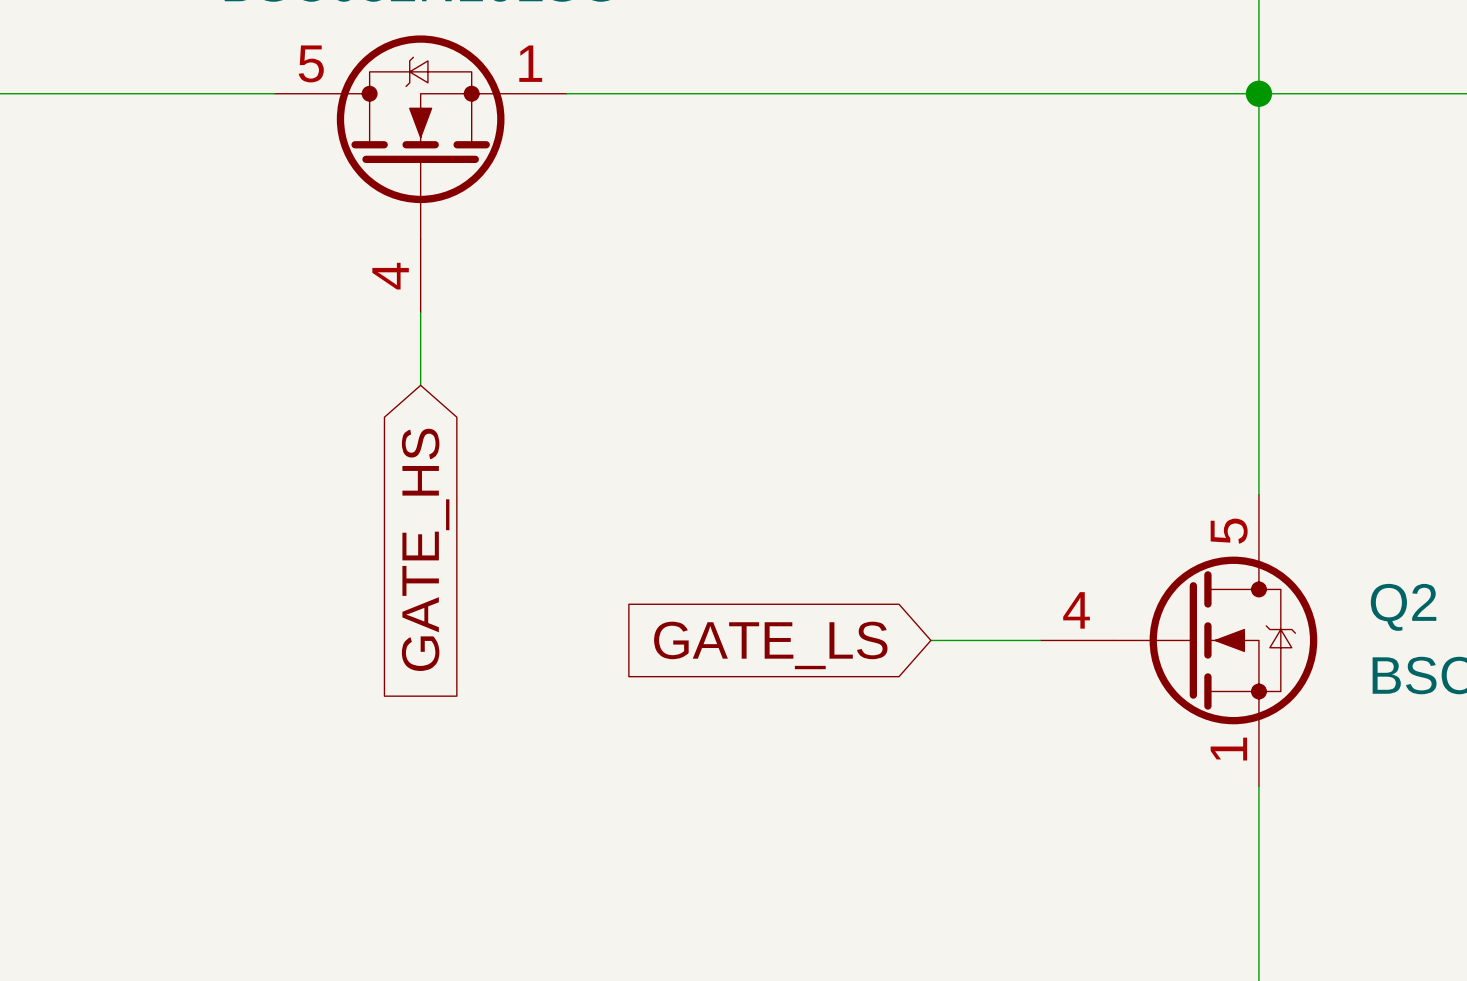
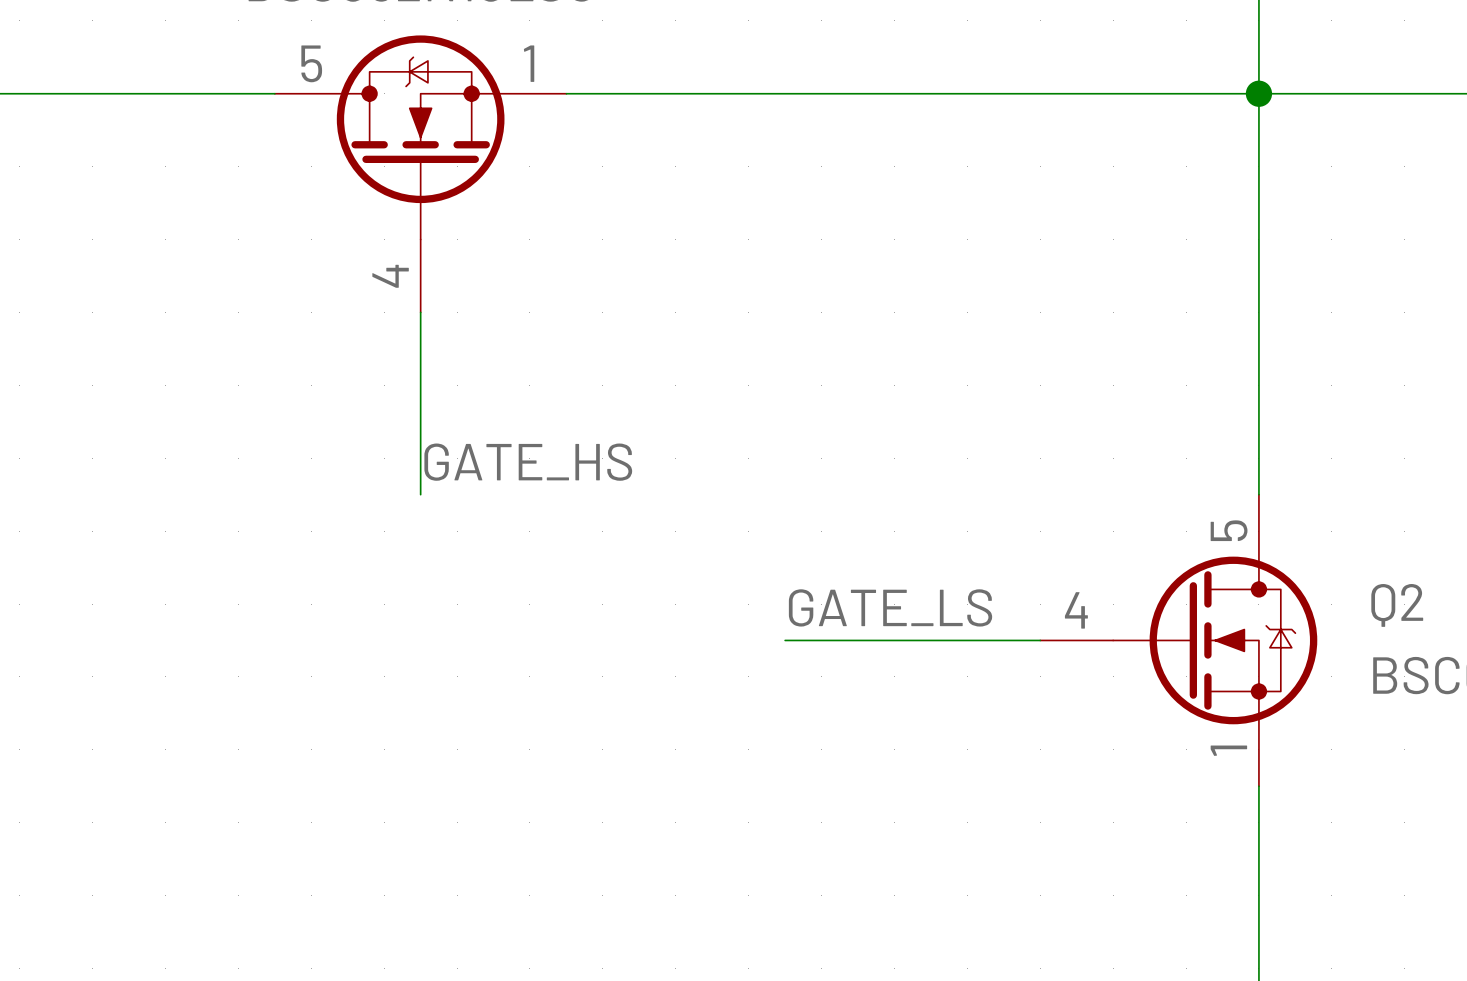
wire: none -> (420, 385) (420, 494)
label: none -> GATE_HS (528, 462)
global label: GATE_HS (425, 549) -> none
label: none -> GATE_LS (890, 607)
wire: none -> (785, 640) (930, 640)
global label: GATE_LS (770, 645) -> none

